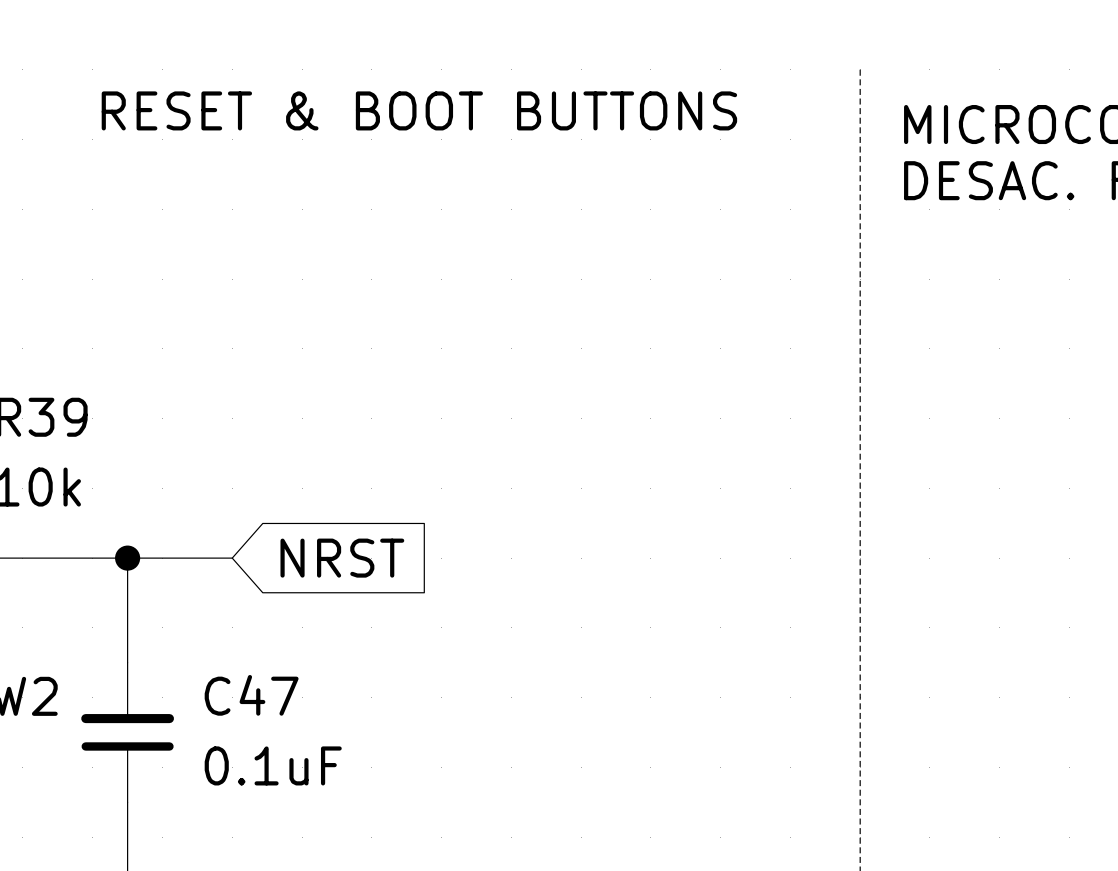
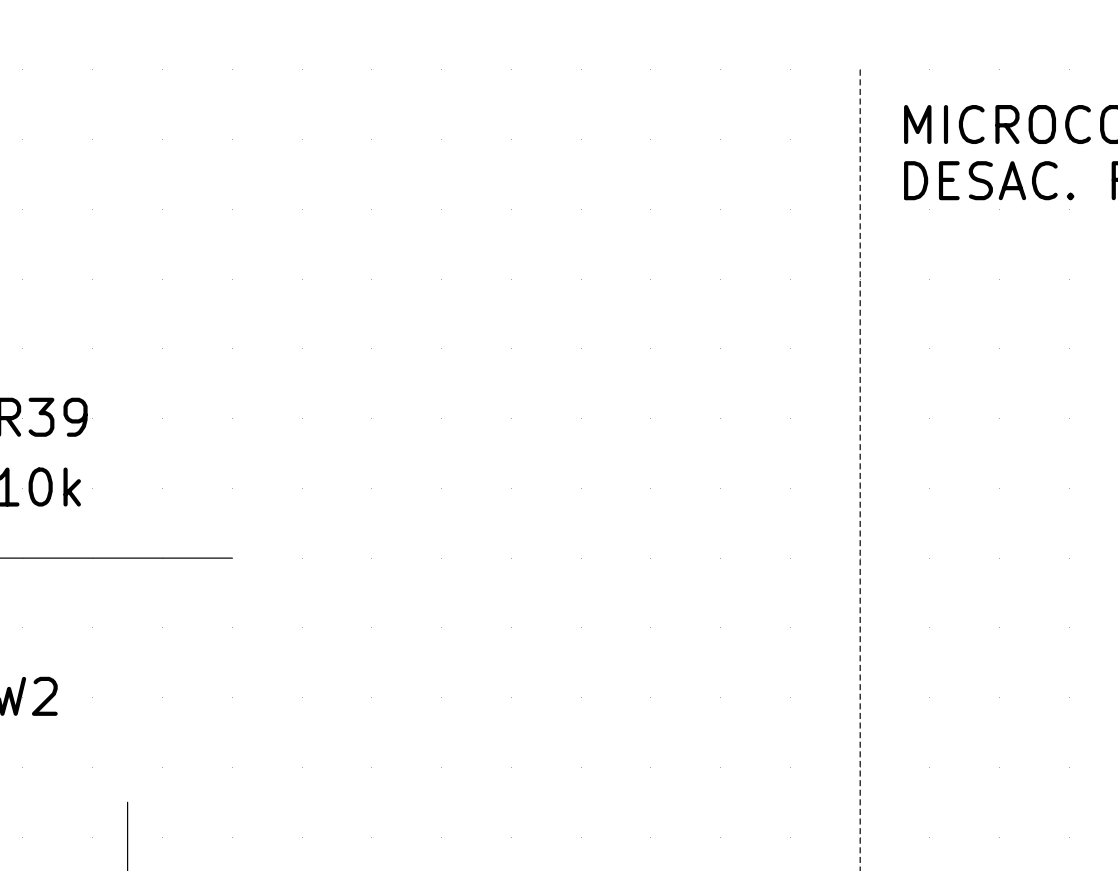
text: RESET & BOOT BUTTONS (419, 110) -> none
wire: (127, 558) (127, 662) -> none
junction: (127, 558) -> none
global label: NRST (342, 558) -> none
C47: 0.1uF (127, 732) -> none

